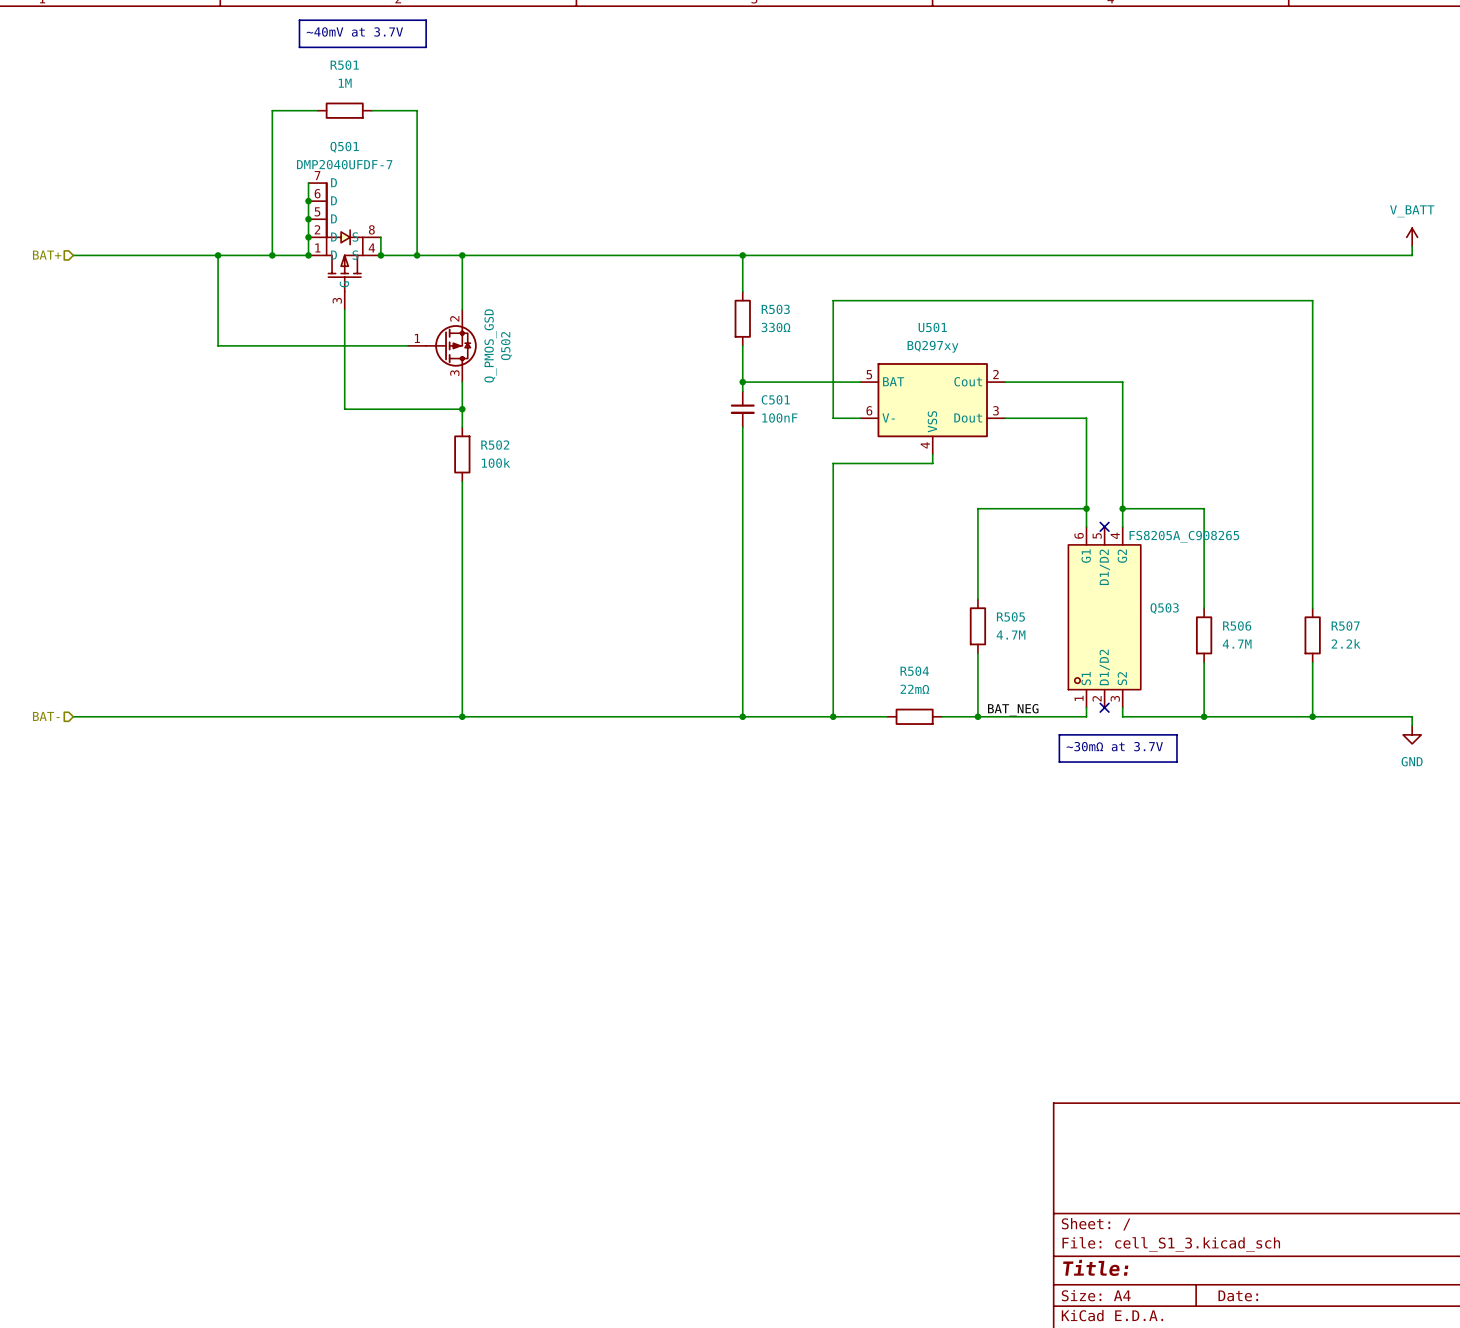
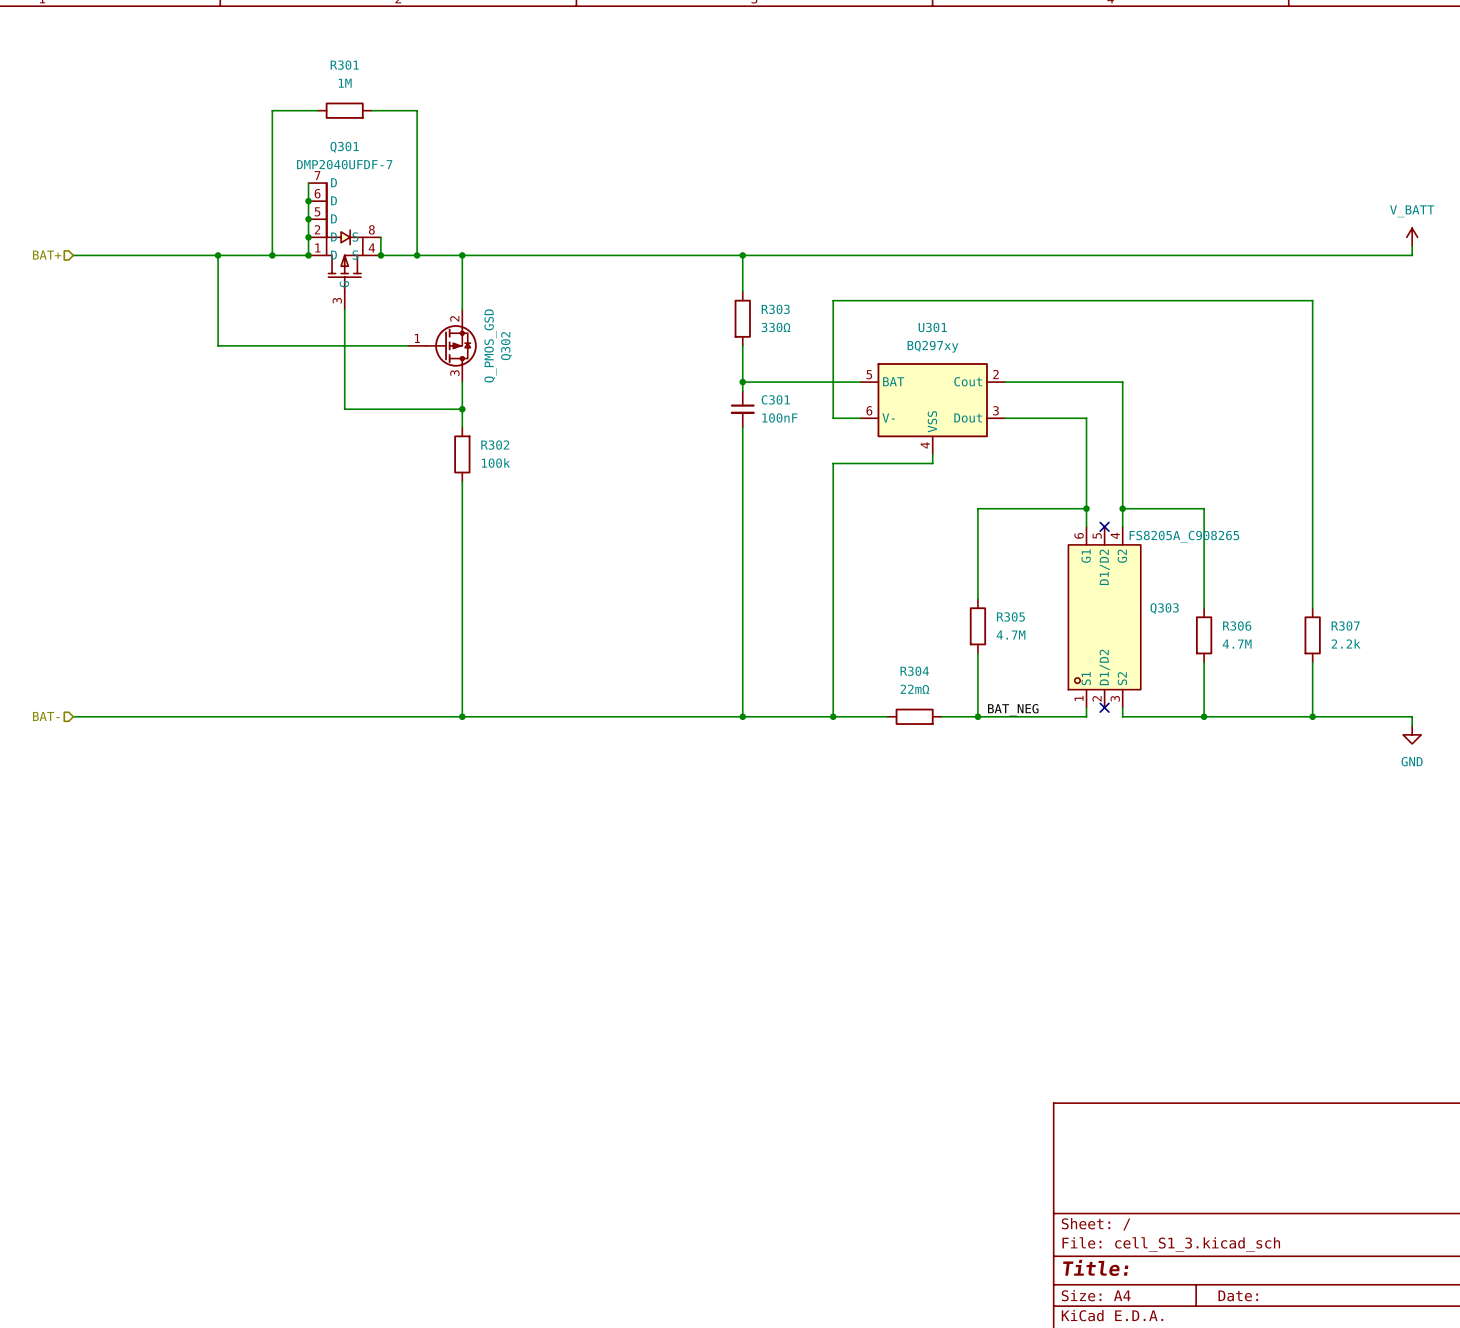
line: (299, 20) (426, 20) (426, 47) (299, 47) (299, 20) -> none
text: ~40mV at 3.7V (354, 31) -> none
R501 name: R501 (344, 65) -> R301 (344, 65)
Q501 name: Q501 (344, 147) -> Q301 (344, 147)
R503 name: R503 (775, 309) -> R303 (775, 309)
U501 name: U501 (932, 327) -> U301 (932, 327)
Q502 name: Q502 (506, 346) -> Q302 (506, 346)
C501 name: C501 (775, 399) -> C301 (775, 399)
R502 name: R502 (495, 445) -> R302 (495, 445)
Q503 name: Q503 (1164, 608) -> Q303 (1164, 608)
R505 name: R505 (1010, 616) -> R305 (1010, 616)
R506 name: R506 (1237, 625) -> R306 (1237, 625)
R507 name: R507 (1345, 625) -> R307 (1345, 625)
R504 name: R504 (914, 671) -> R304 (914, 671)
line: (1059, 734) (1176, 734) (1176, 762) (1059, 762) (1059, 734) -> none
text: ~30mΩ at 3.7V (1114, 746) -> none

